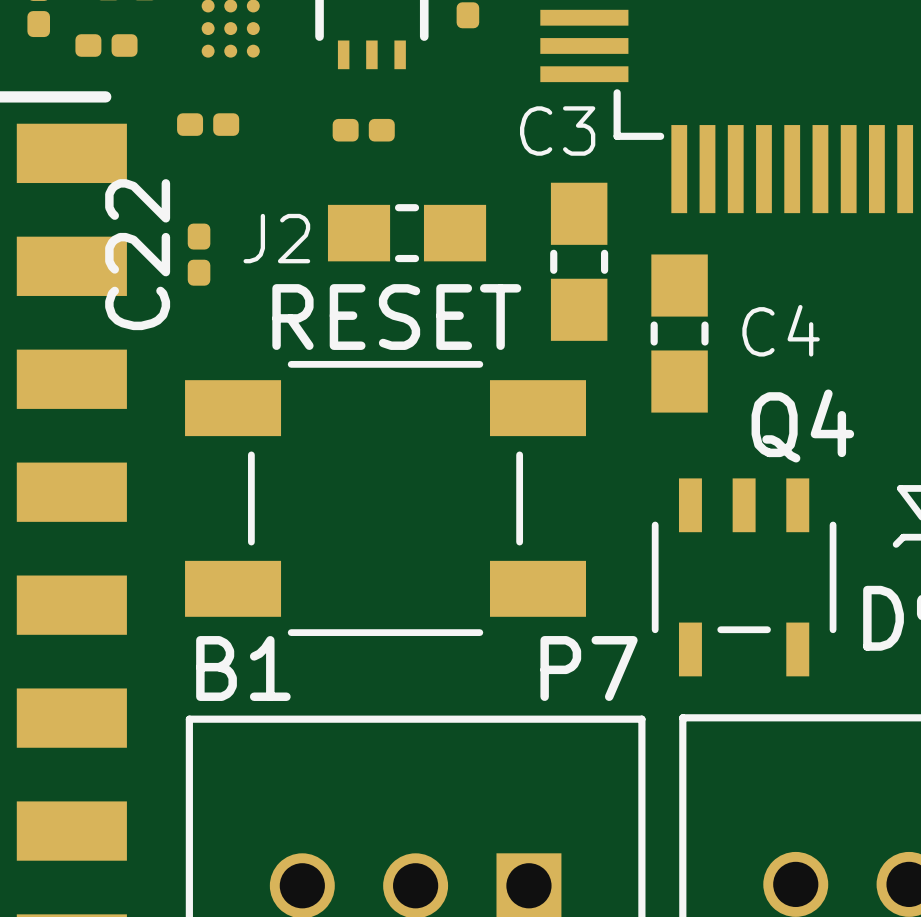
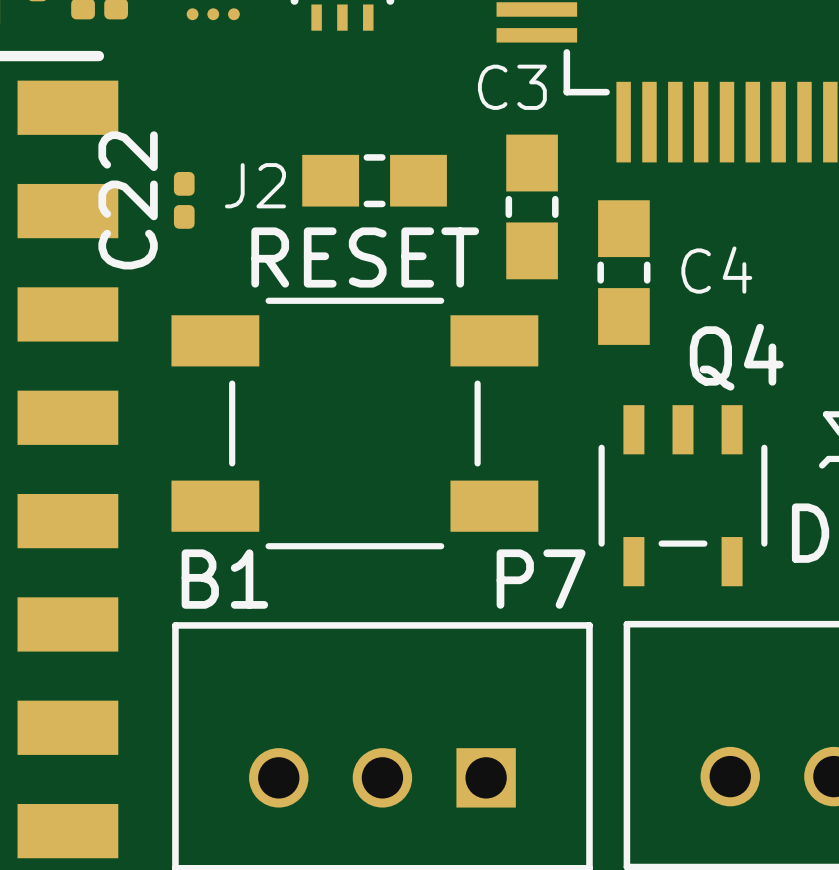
part: (208, 124) -> none
part: (363, 130) -> none

